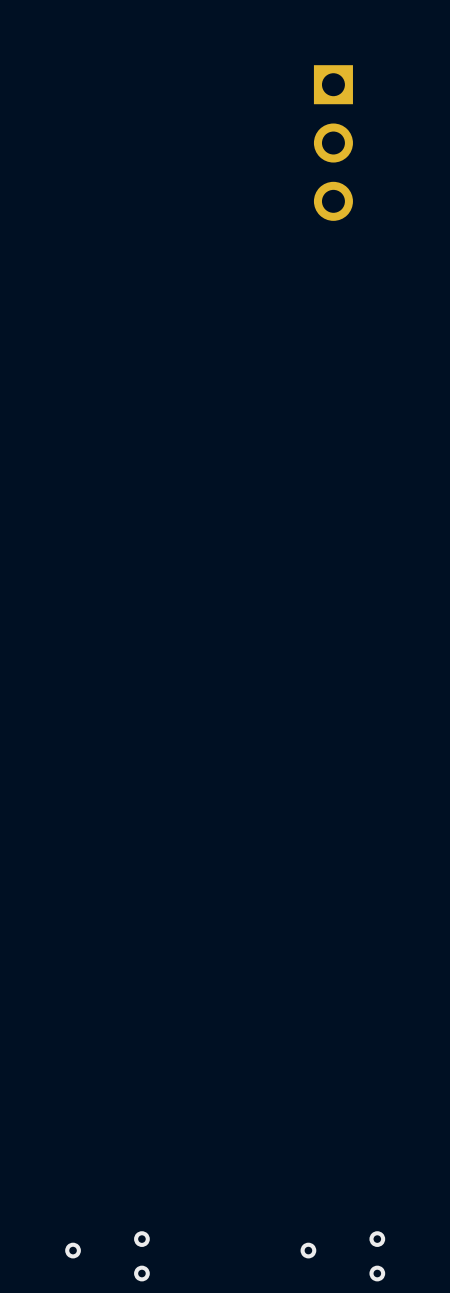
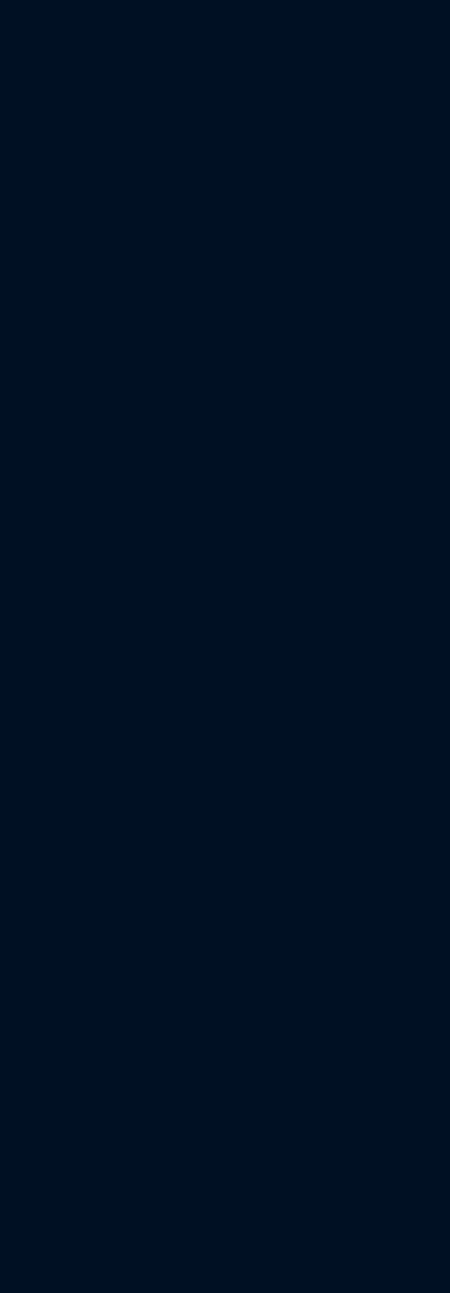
part: (333, 143) -> none
via: (141, 1239) -> none
via: (377, 1239) -> none
via: (73, 1250) -> none
via: (308, 1250) -> none
via: (141, 1273) -> none
via: (377, 1273) -> none

